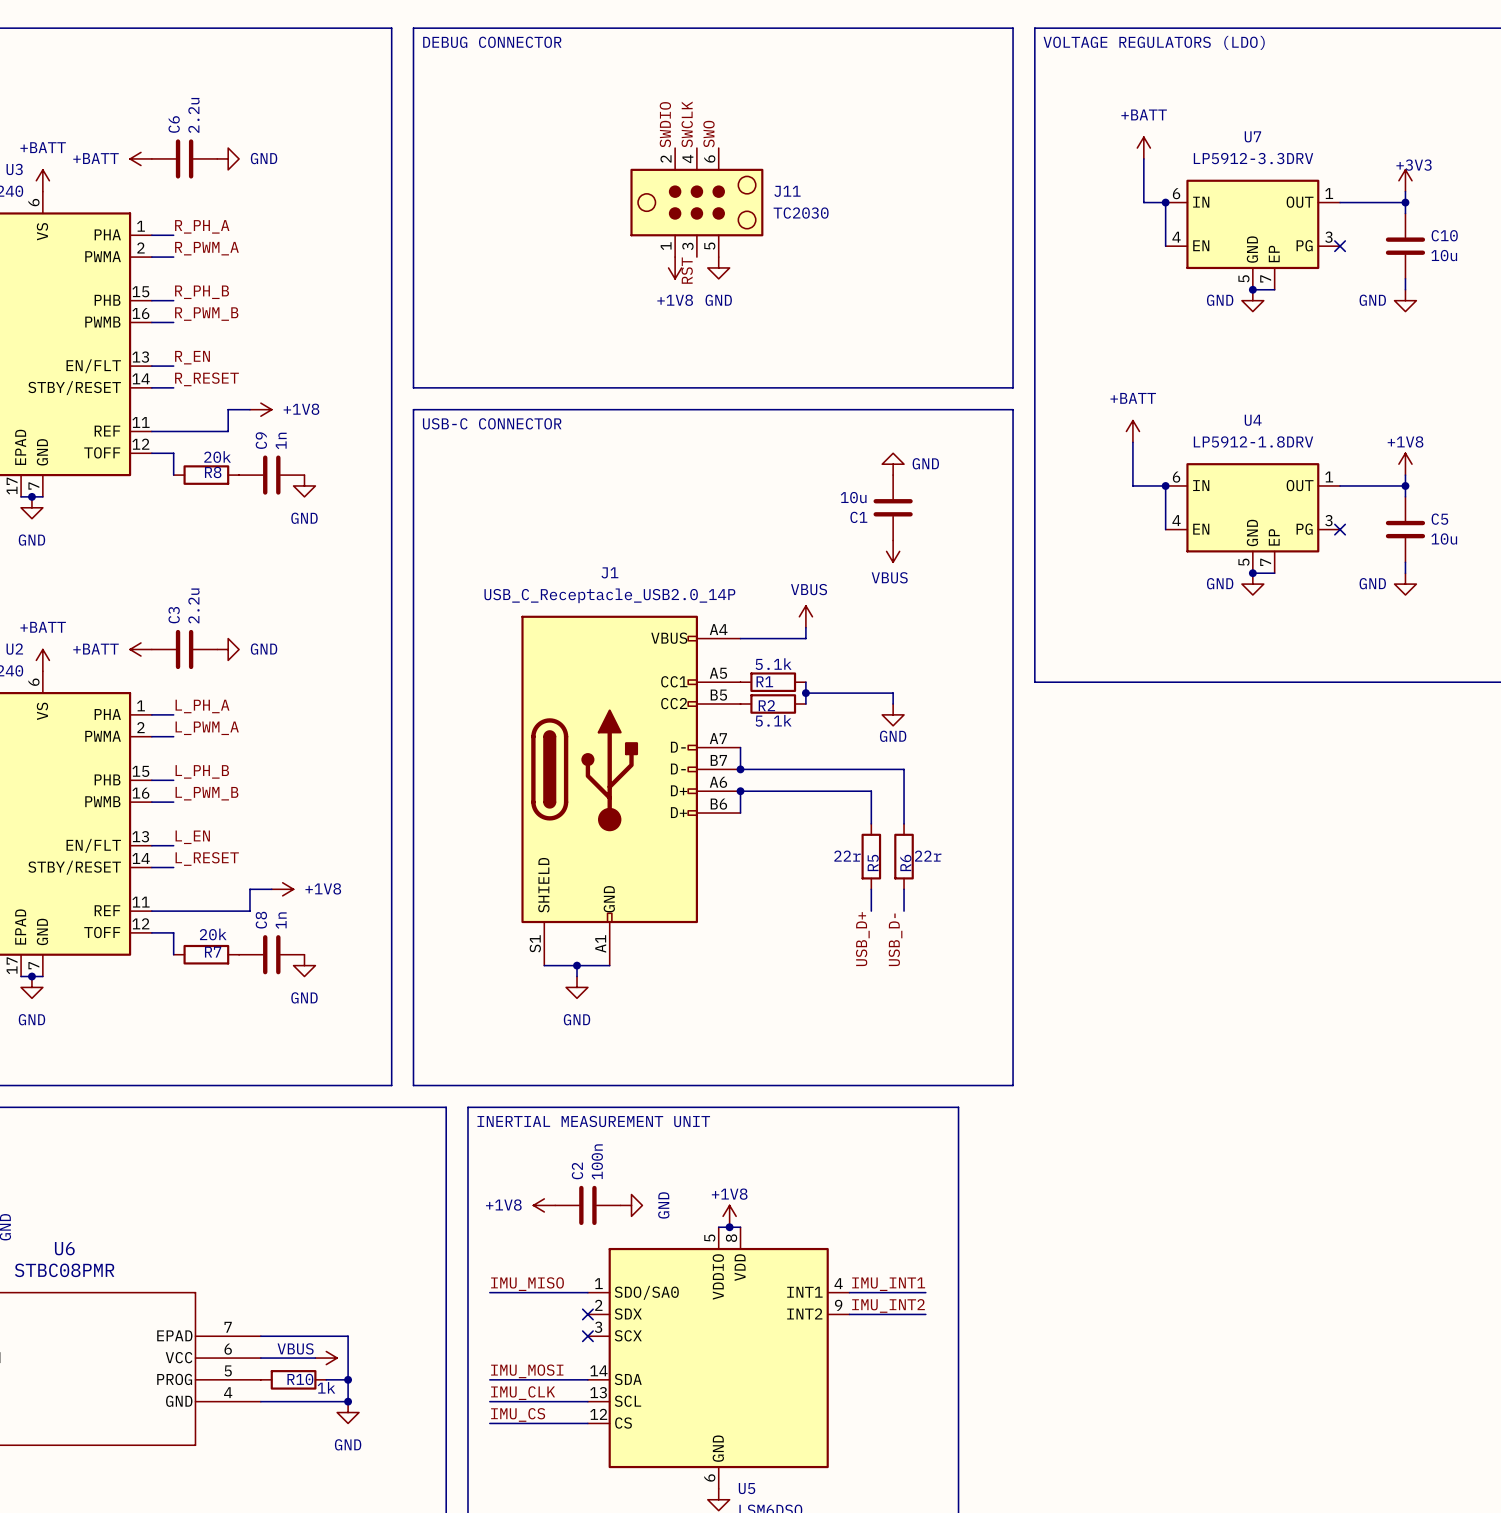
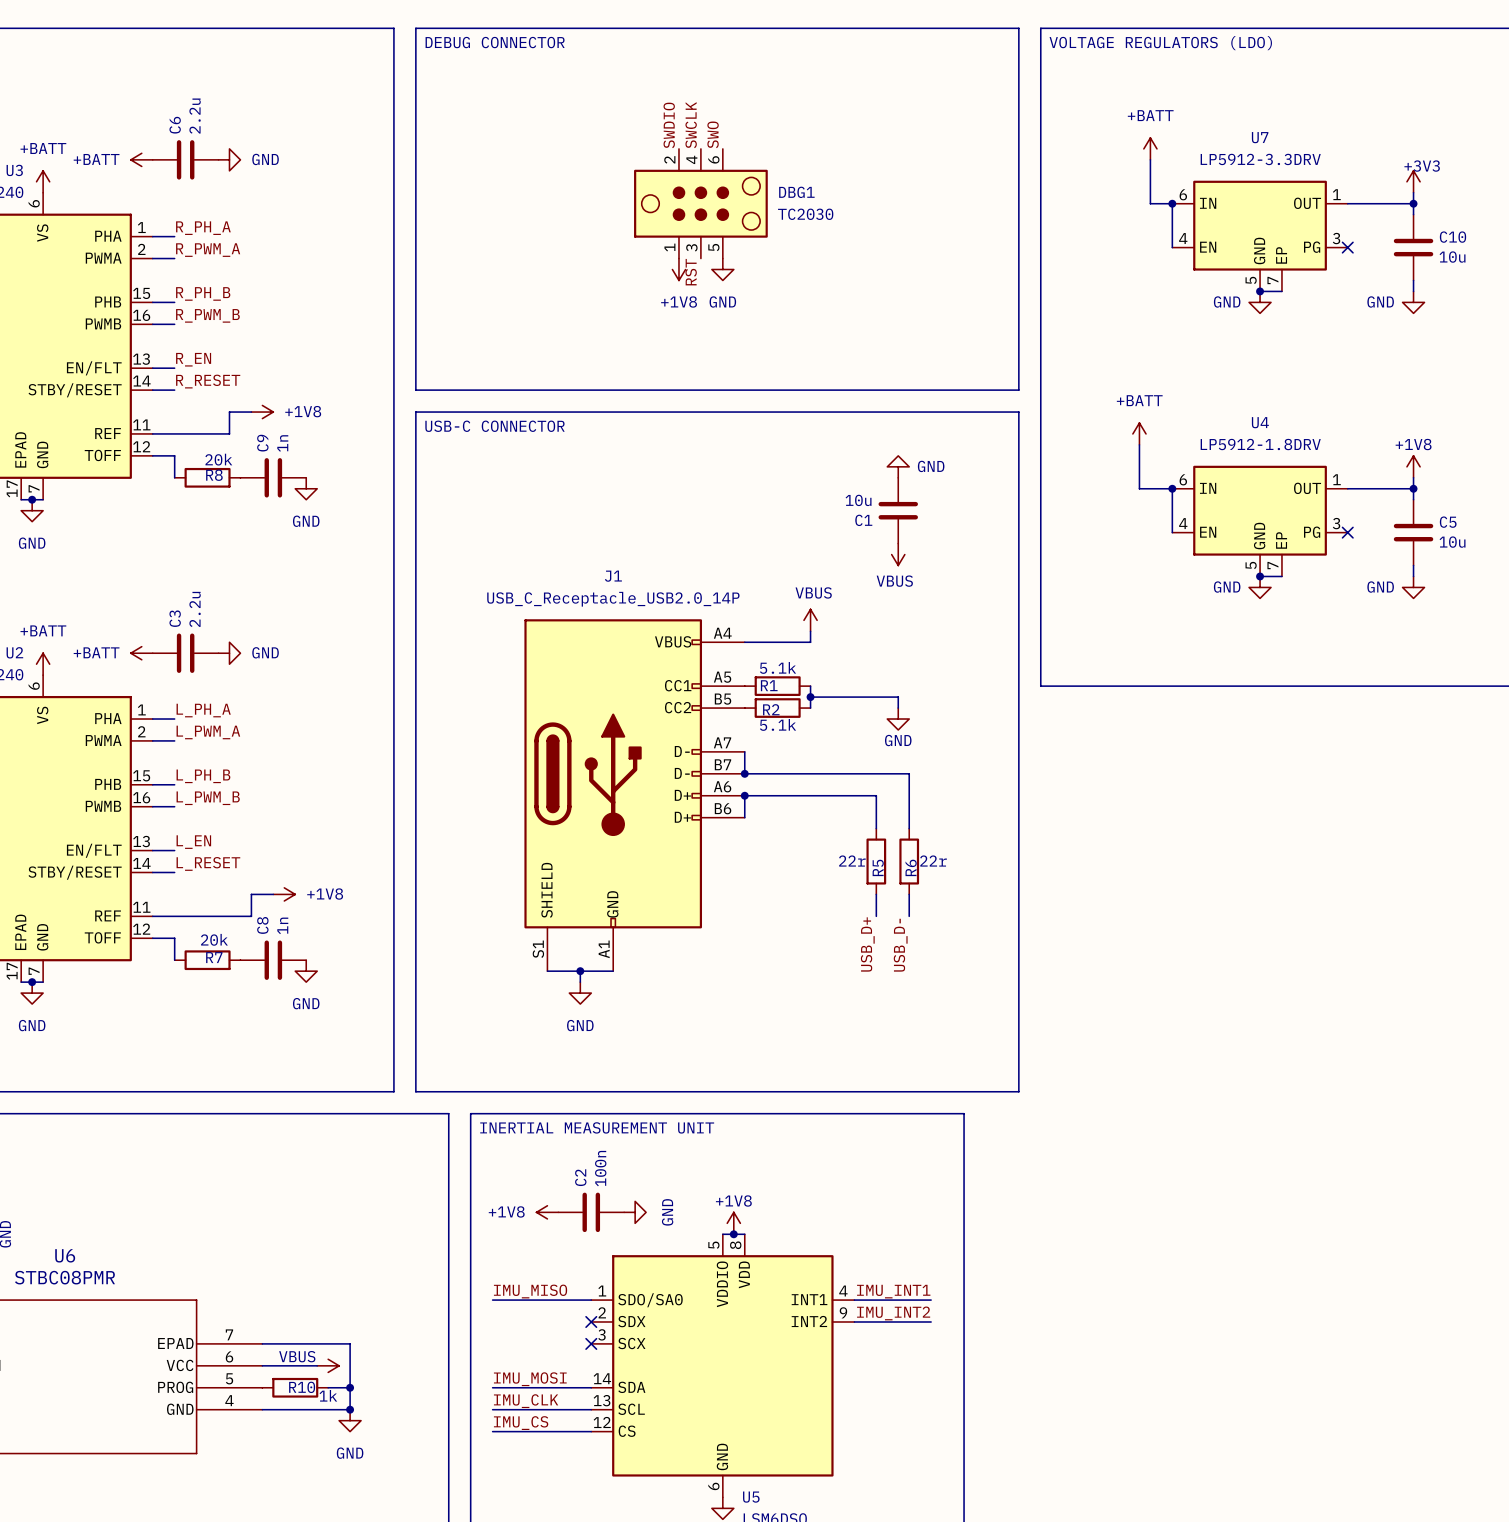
J11 name: J11 (787, 191) -> DBG1 (796, 192)

